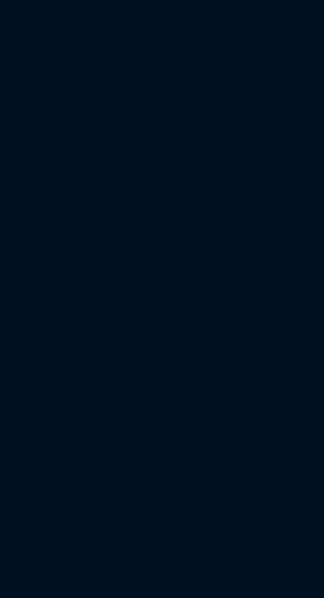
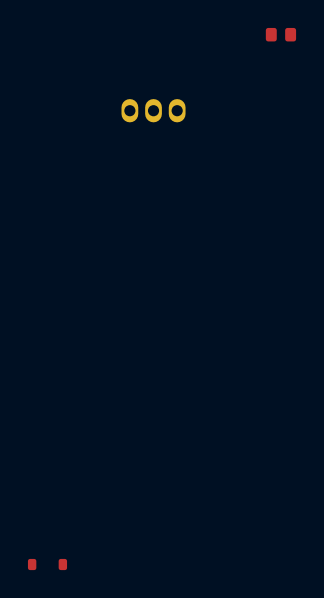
part: none -> (280, 34)
part: none -> (153, 110)
part: none -> (47, 564)

